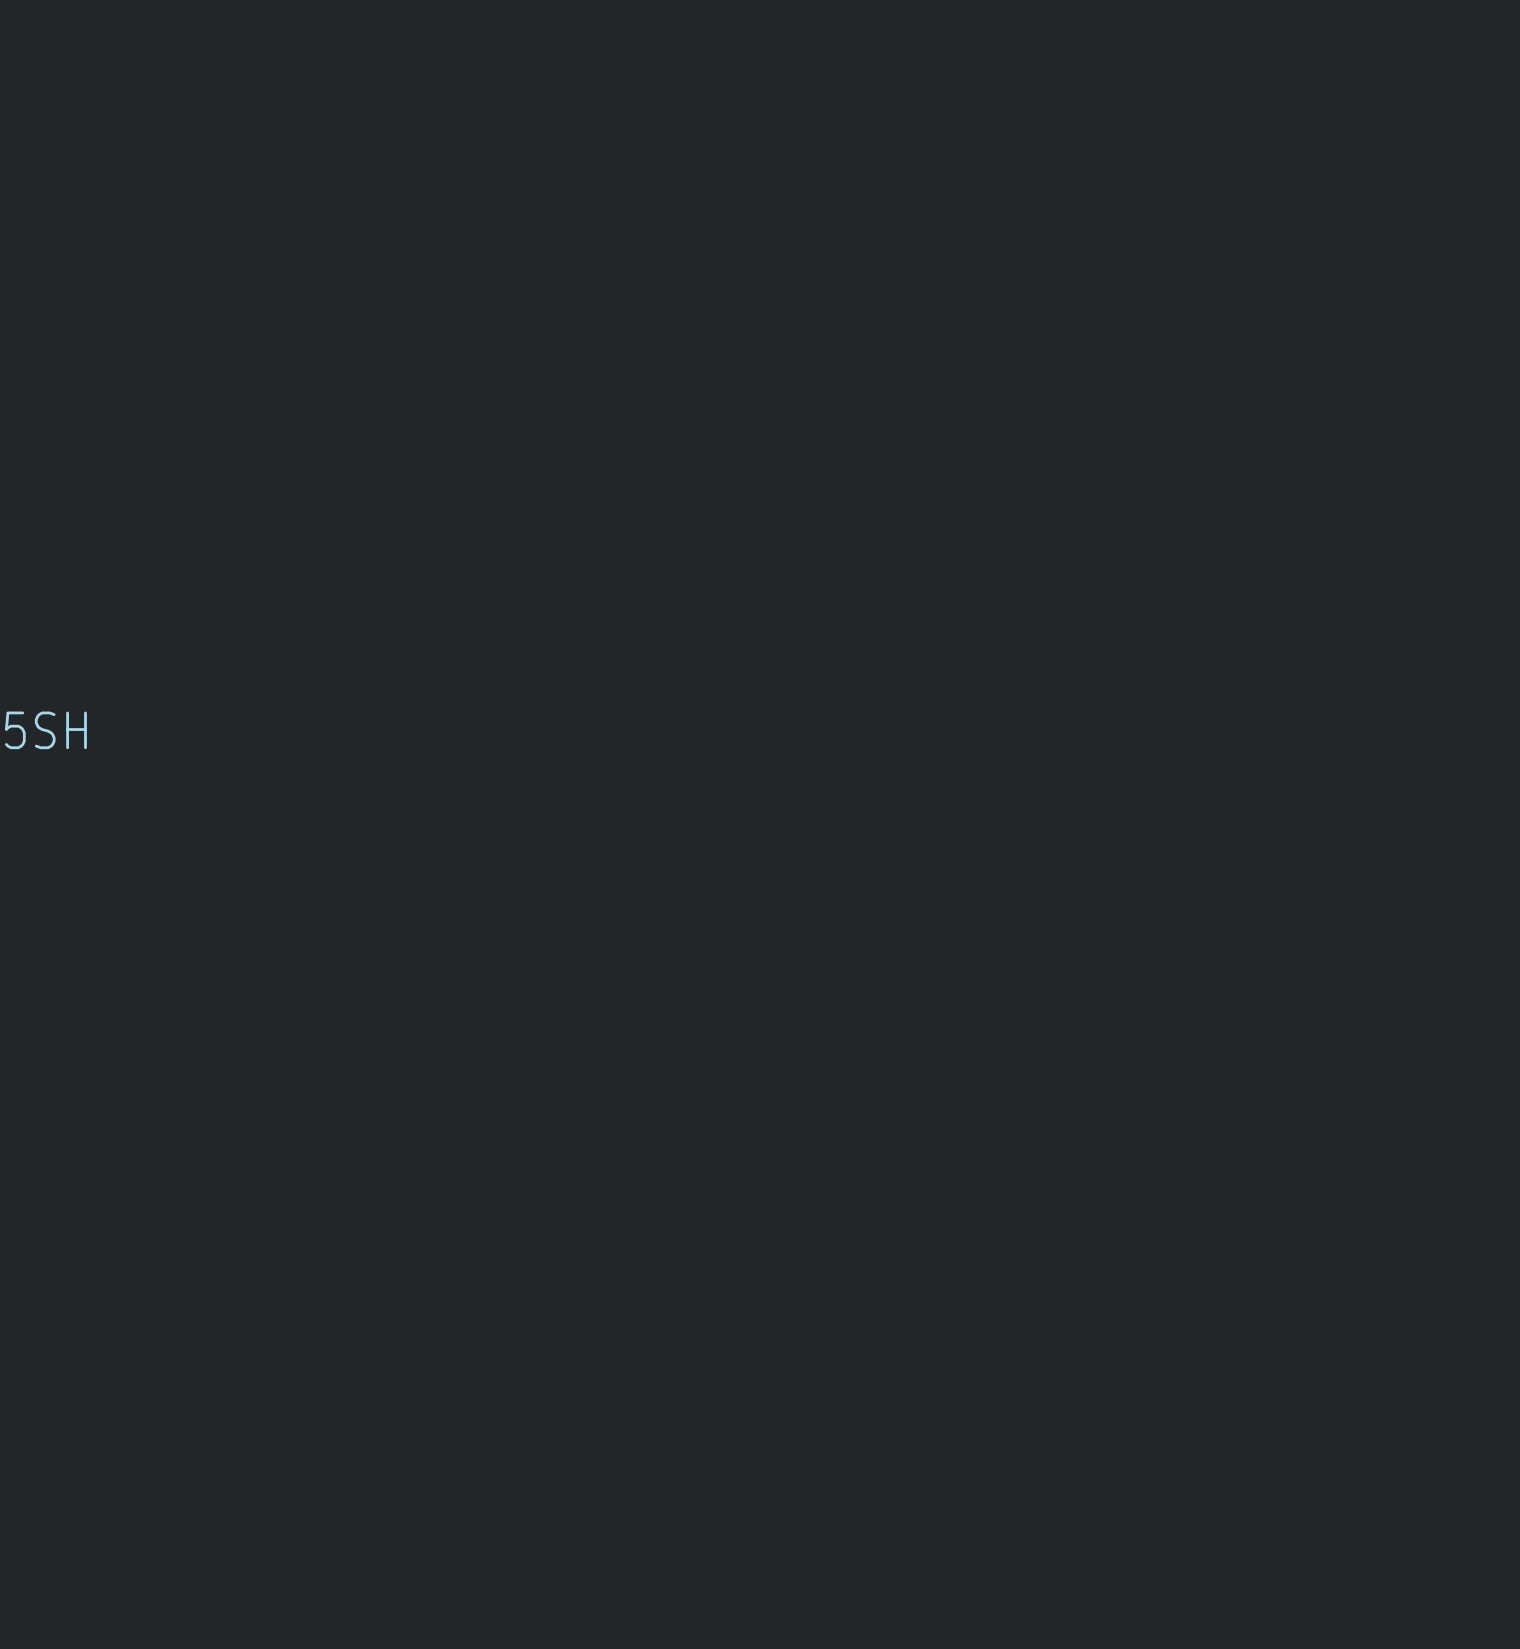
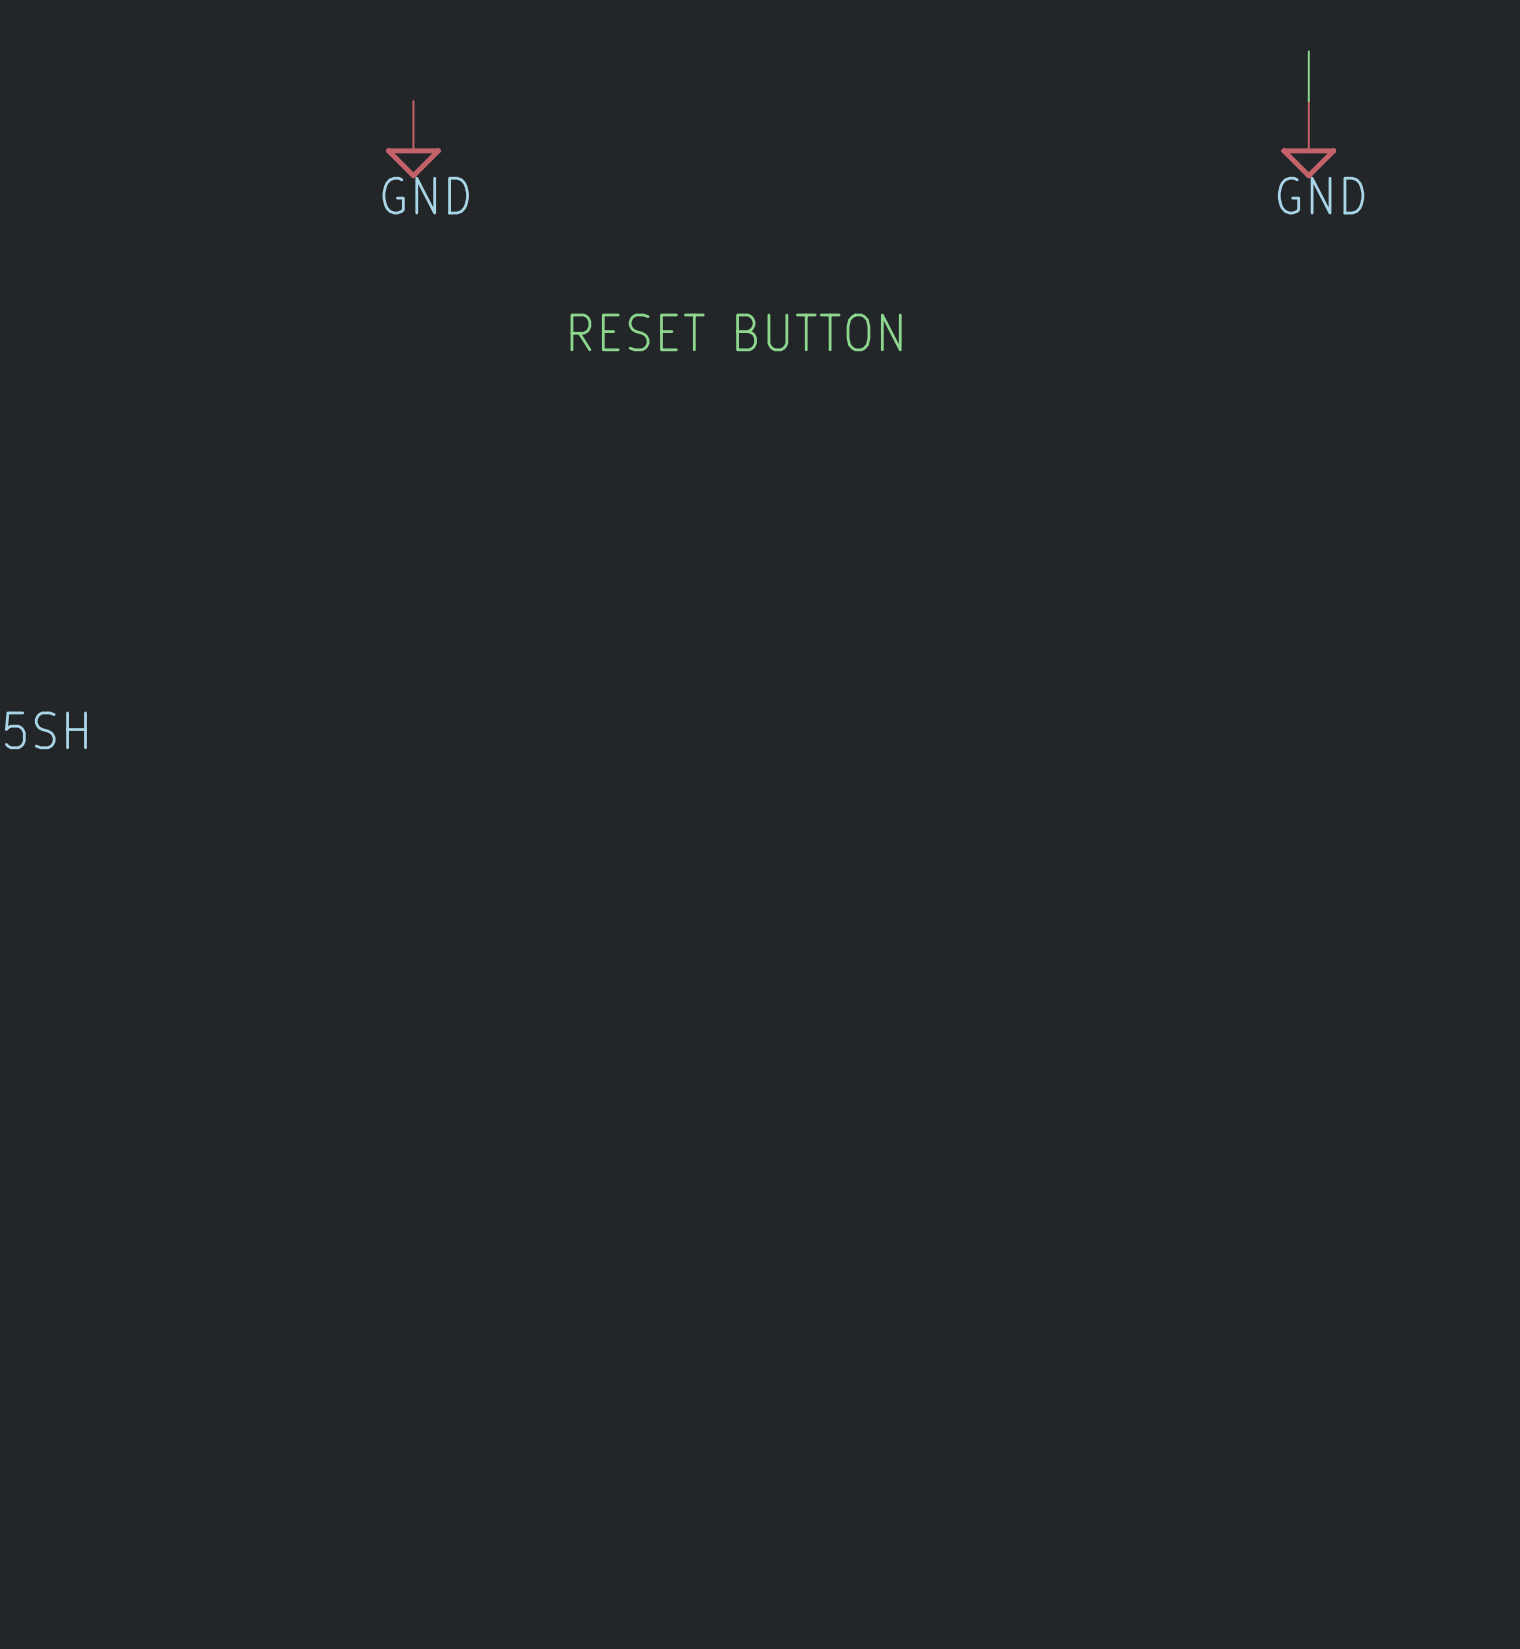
wire: none -> (1308, 51) (1308, 101)
power symbol: none -> GND (413, 139)
power symbol: none -> GND (1308, 139)
text: none -> RESET BUTTON (736, 332)

